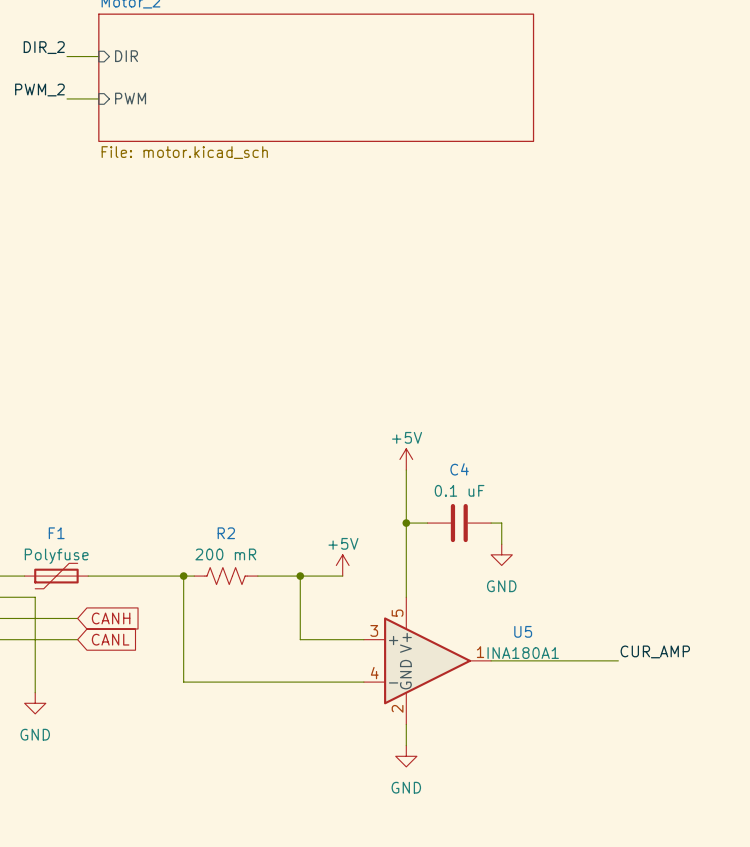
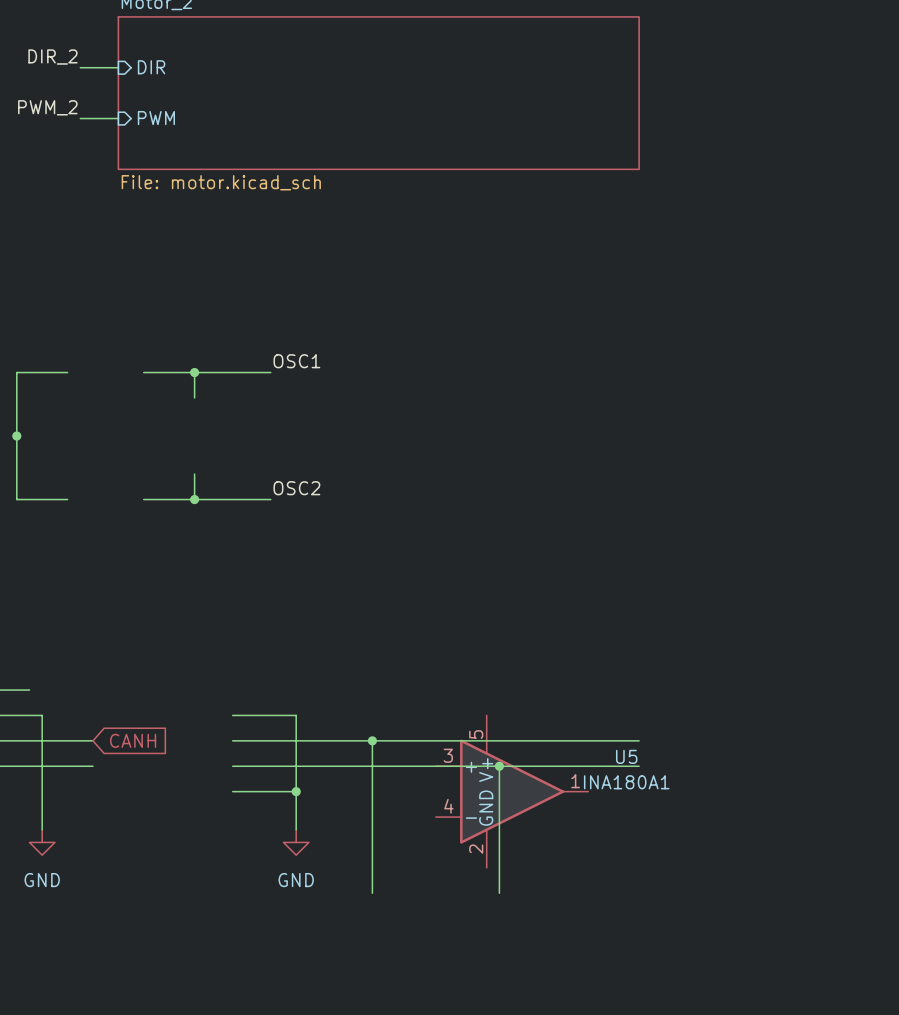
label: none -> OSC1 (296, 361)
wire: none -> (67, 372) (16, 372) (16, 499) (67, 499)
wire: none -> (143, 372) (270, 372)
wire: none -> (194, 372) (194, 397)
junction: none -> (194, 372)
junction: none -> (16, 436)
wire: none -> (194, 474) (194, 499)
label: none -> OSC2 (296, 488)
junction: none -> (194, 499)
power symbol: +5V (406, 459) -> none
wire: (406, 470) (406, 597) -> (372, 740) (372, 893)
wire: (406, 523) (427, 523) -> none
junction: (406, 523) -> none
C4: 0.1 uF (459, 523) -> none
wire: (491, 523) (501, 523) (501, 544) -> none
power symbol: GND (501, 554) -> none
power symbol: +5V (342, 565) -> none
F1: Polyfuse (56, 576) -> none
wire: (88, 576) (194, 576) -> (143, 499) (270, 499)
wire: (183, 576) (183, 682) (363, 682) -> none
junction: (183, 576) -> none
R2: 200 mR (226, 576) -> none
wire: (257, 576) (342, 576) -> none
wire: (300, 576) (300, 639) -> (232, 766) (359, 766)
junction position: (300, 576) -> (372, 740)
wire: none -> (232, 715) (296, 715) (296, 829)
wire: none -> (232, 740) (639, 740)
global label: CANL (110, 639) -> none
wire: none -> (435, 766) (639, 766)
wire: none -> (499, 766) (499, 893)
junction: none -> (499, 766)
label: CUR_AMP (655, 651) -> none
wire: none -> (232, 791) (296, 791)
junction: none -> (296, 791)
wire: (491, 660) (618, 660) -> none
power symbol: none -> GND (296, 842)
wire: (406, 724) (406, 745) -> none
power symbol: GND (406, 756) -> none

